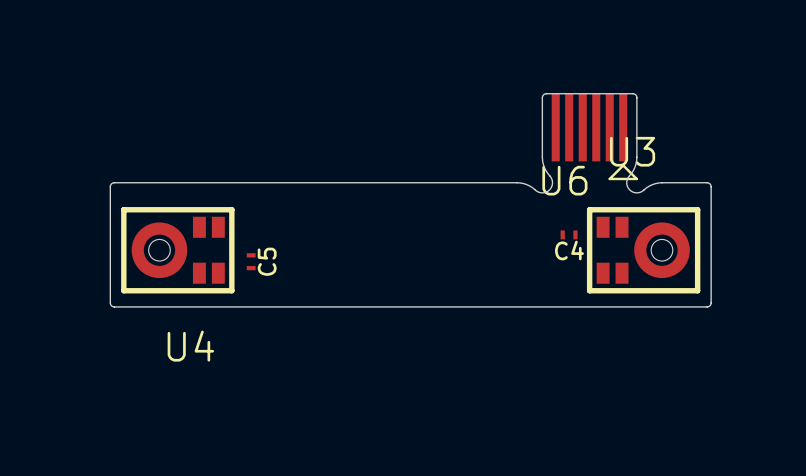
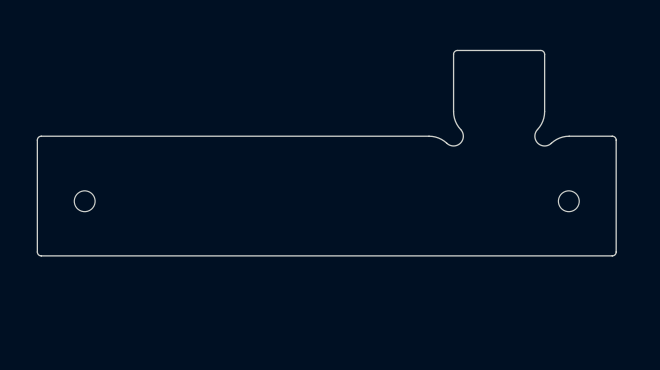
U6: (594, 137) -> none
C4: (569, 234) -> none
U4: (177, 250) -> none
U3: (643, 250) -> none
C5: (251, 261) -> none

